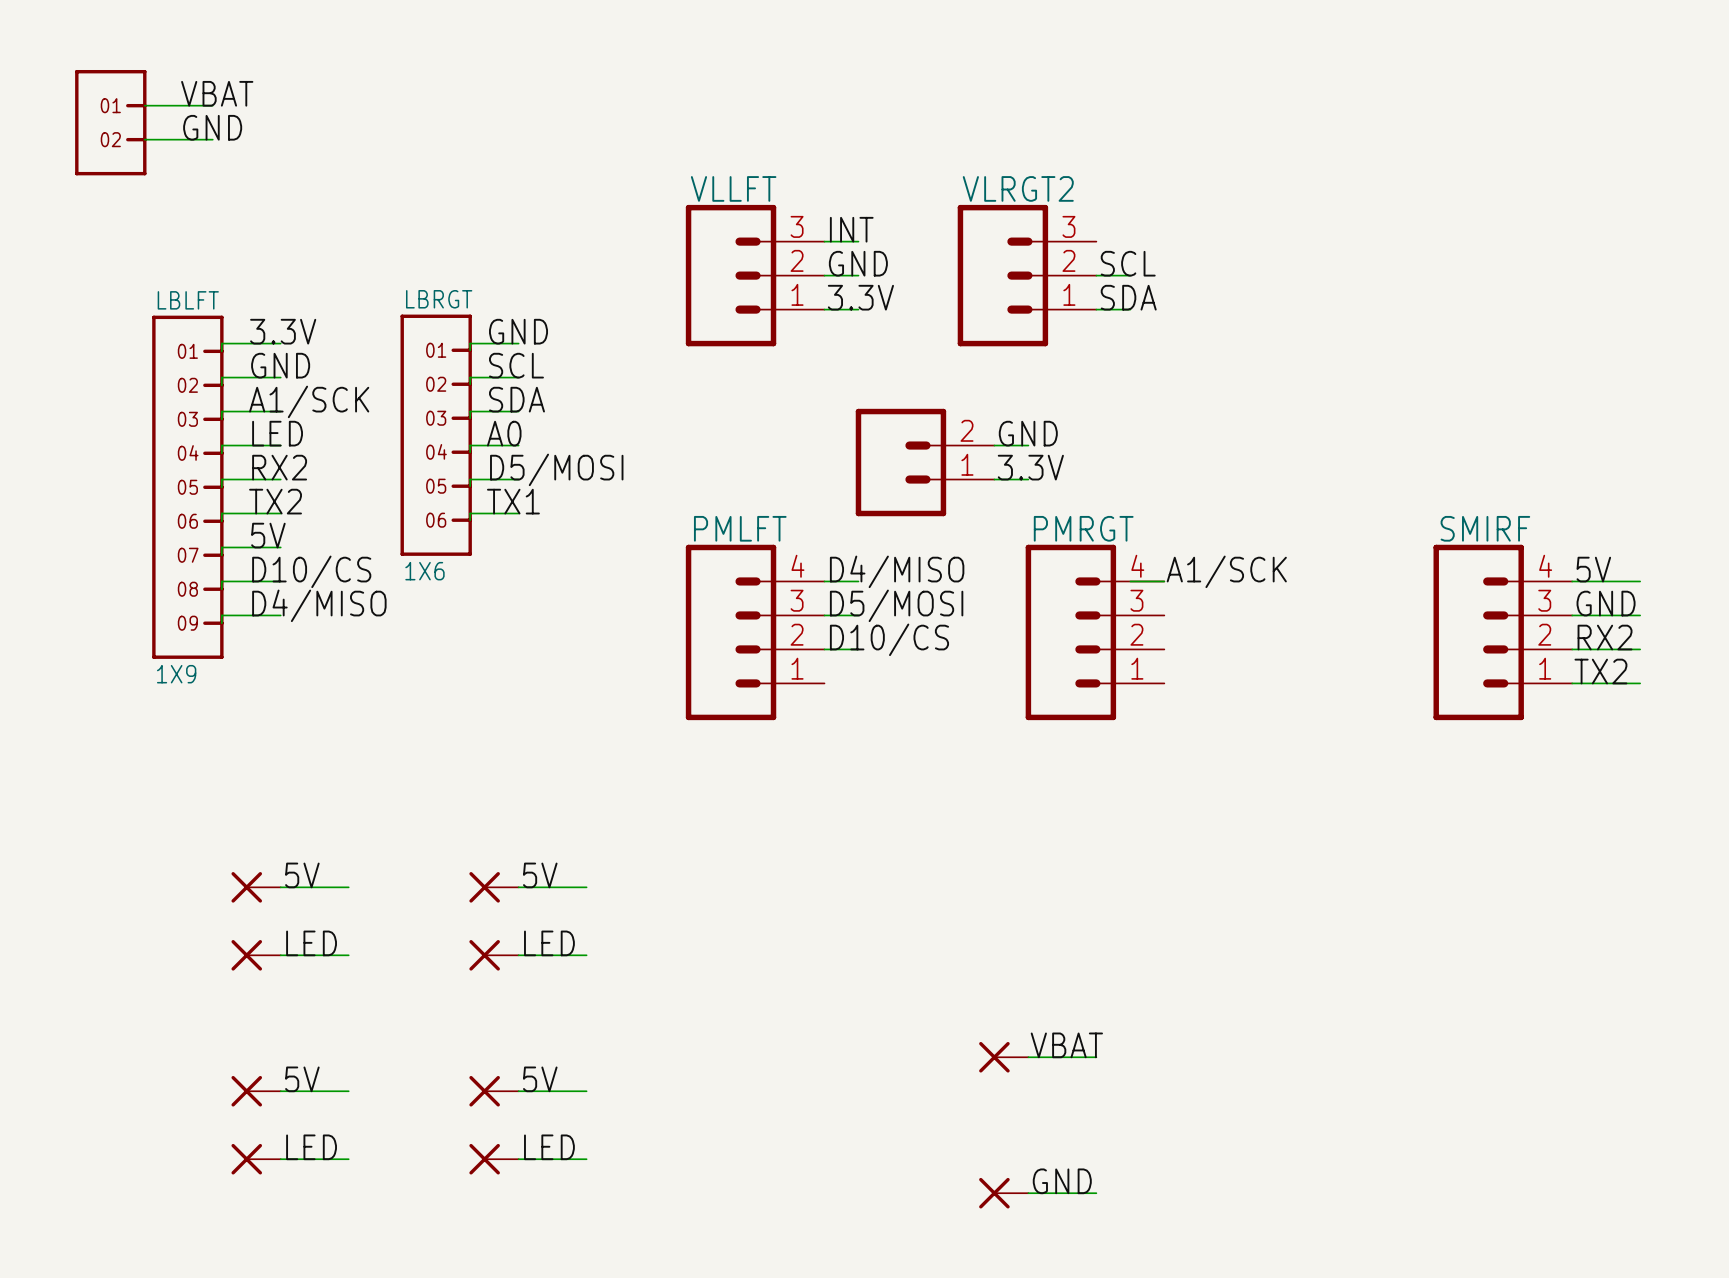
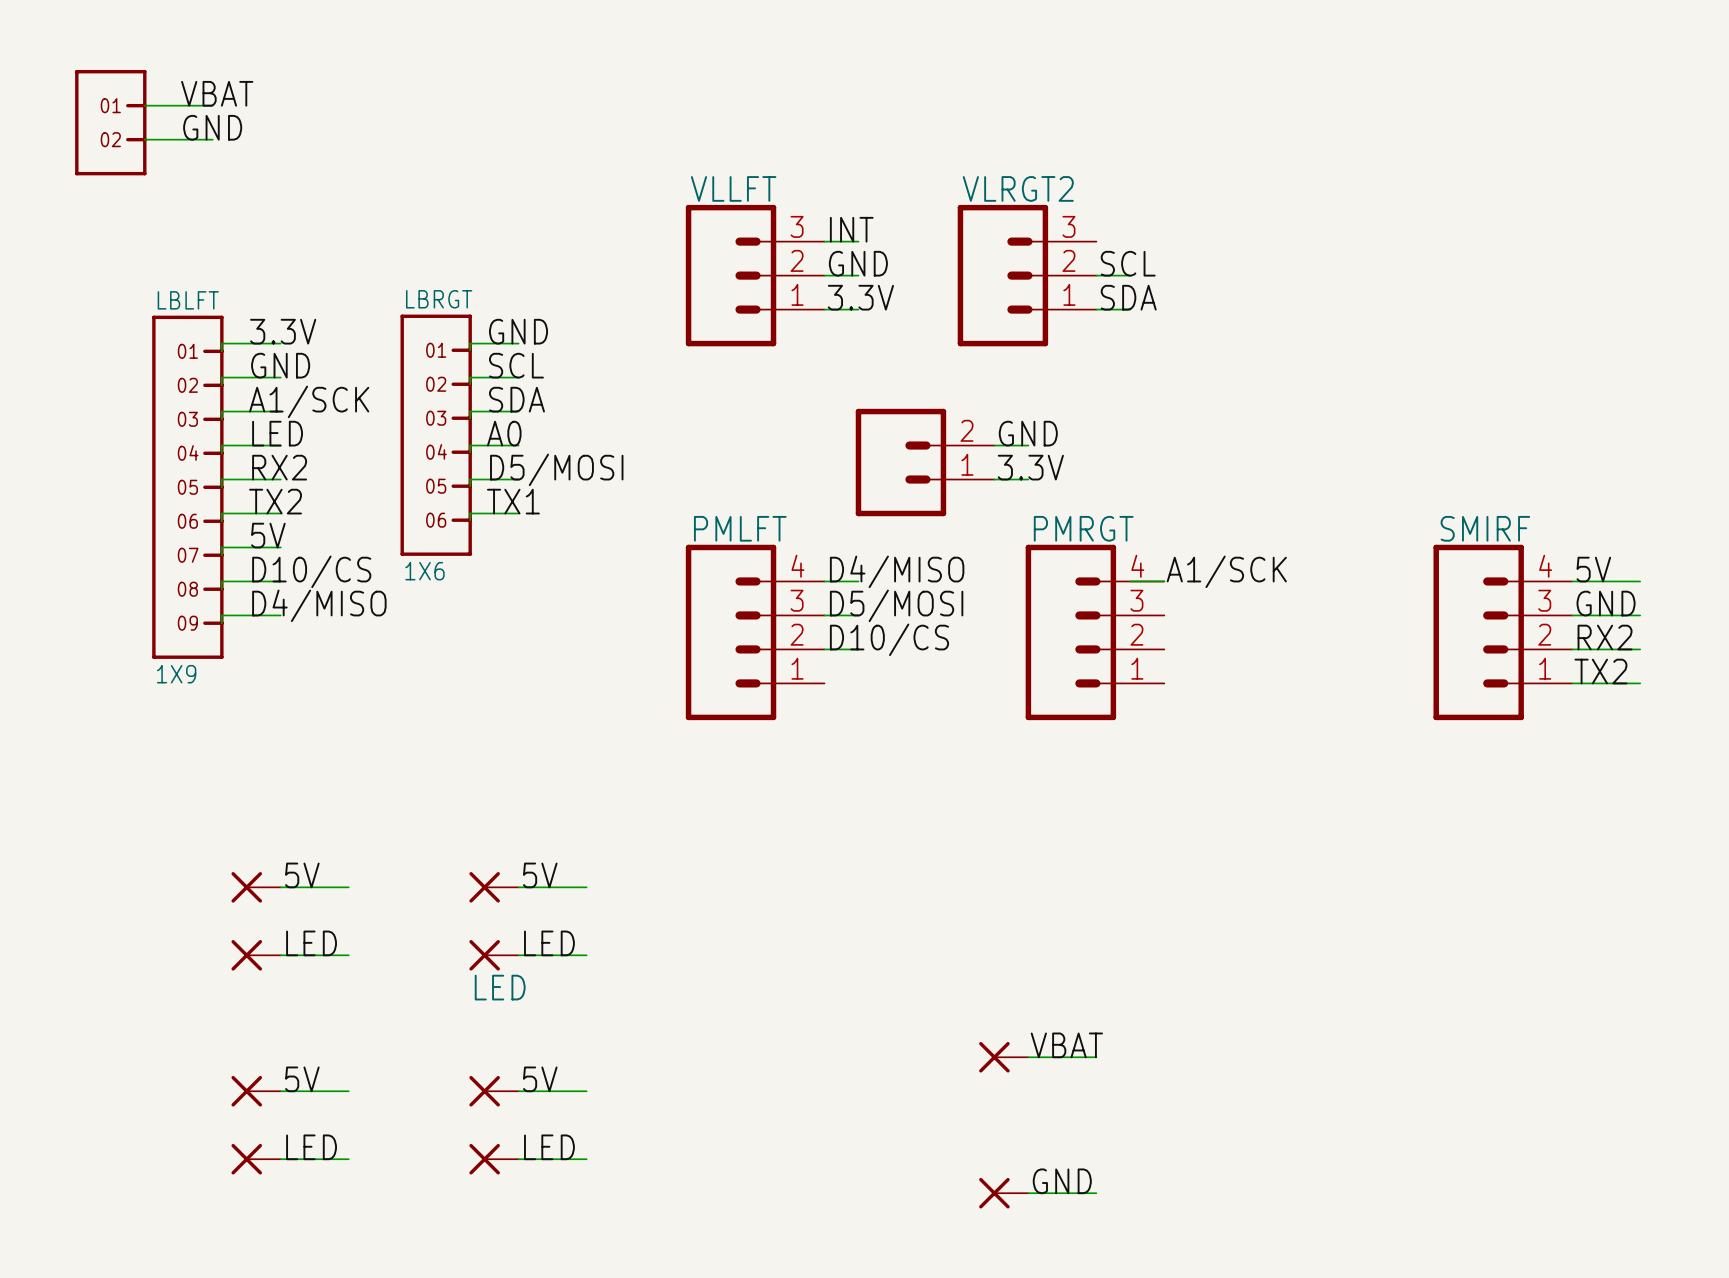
part value: none -> LED (500, 987)

